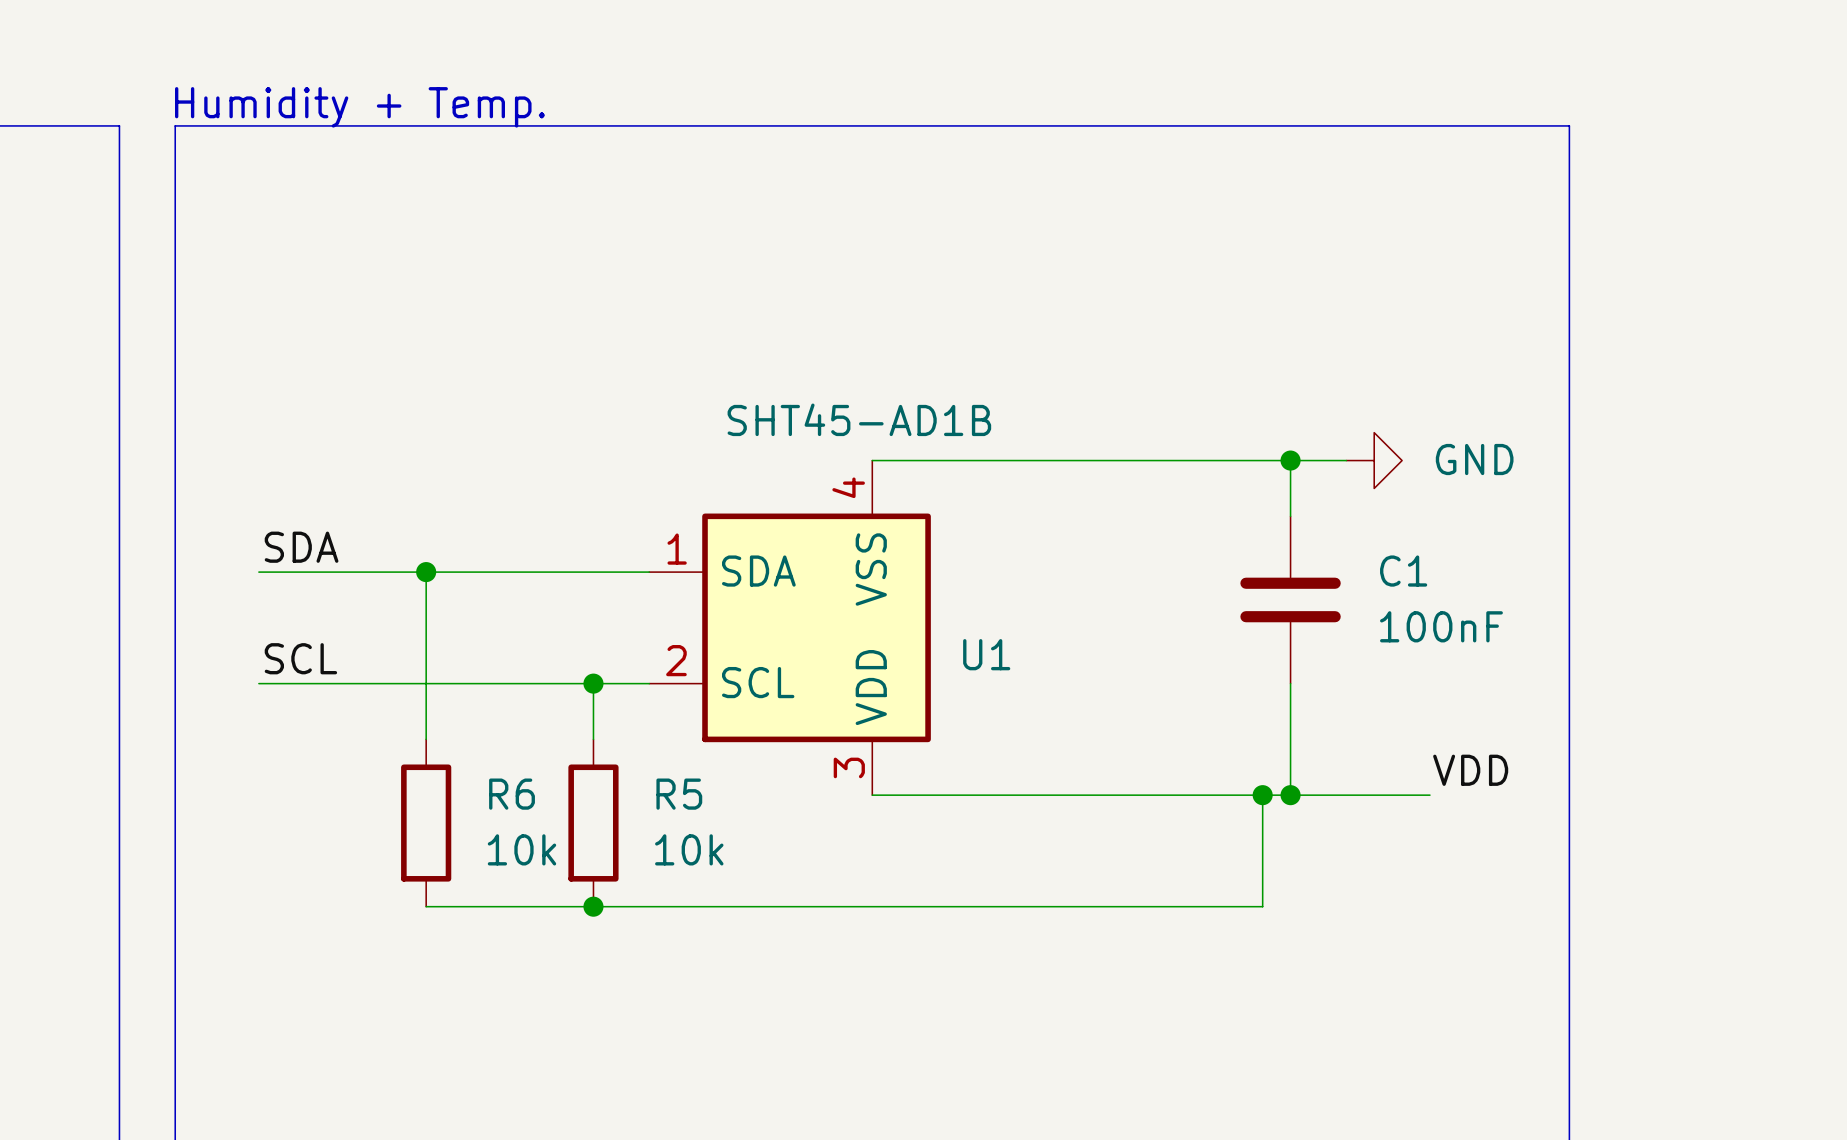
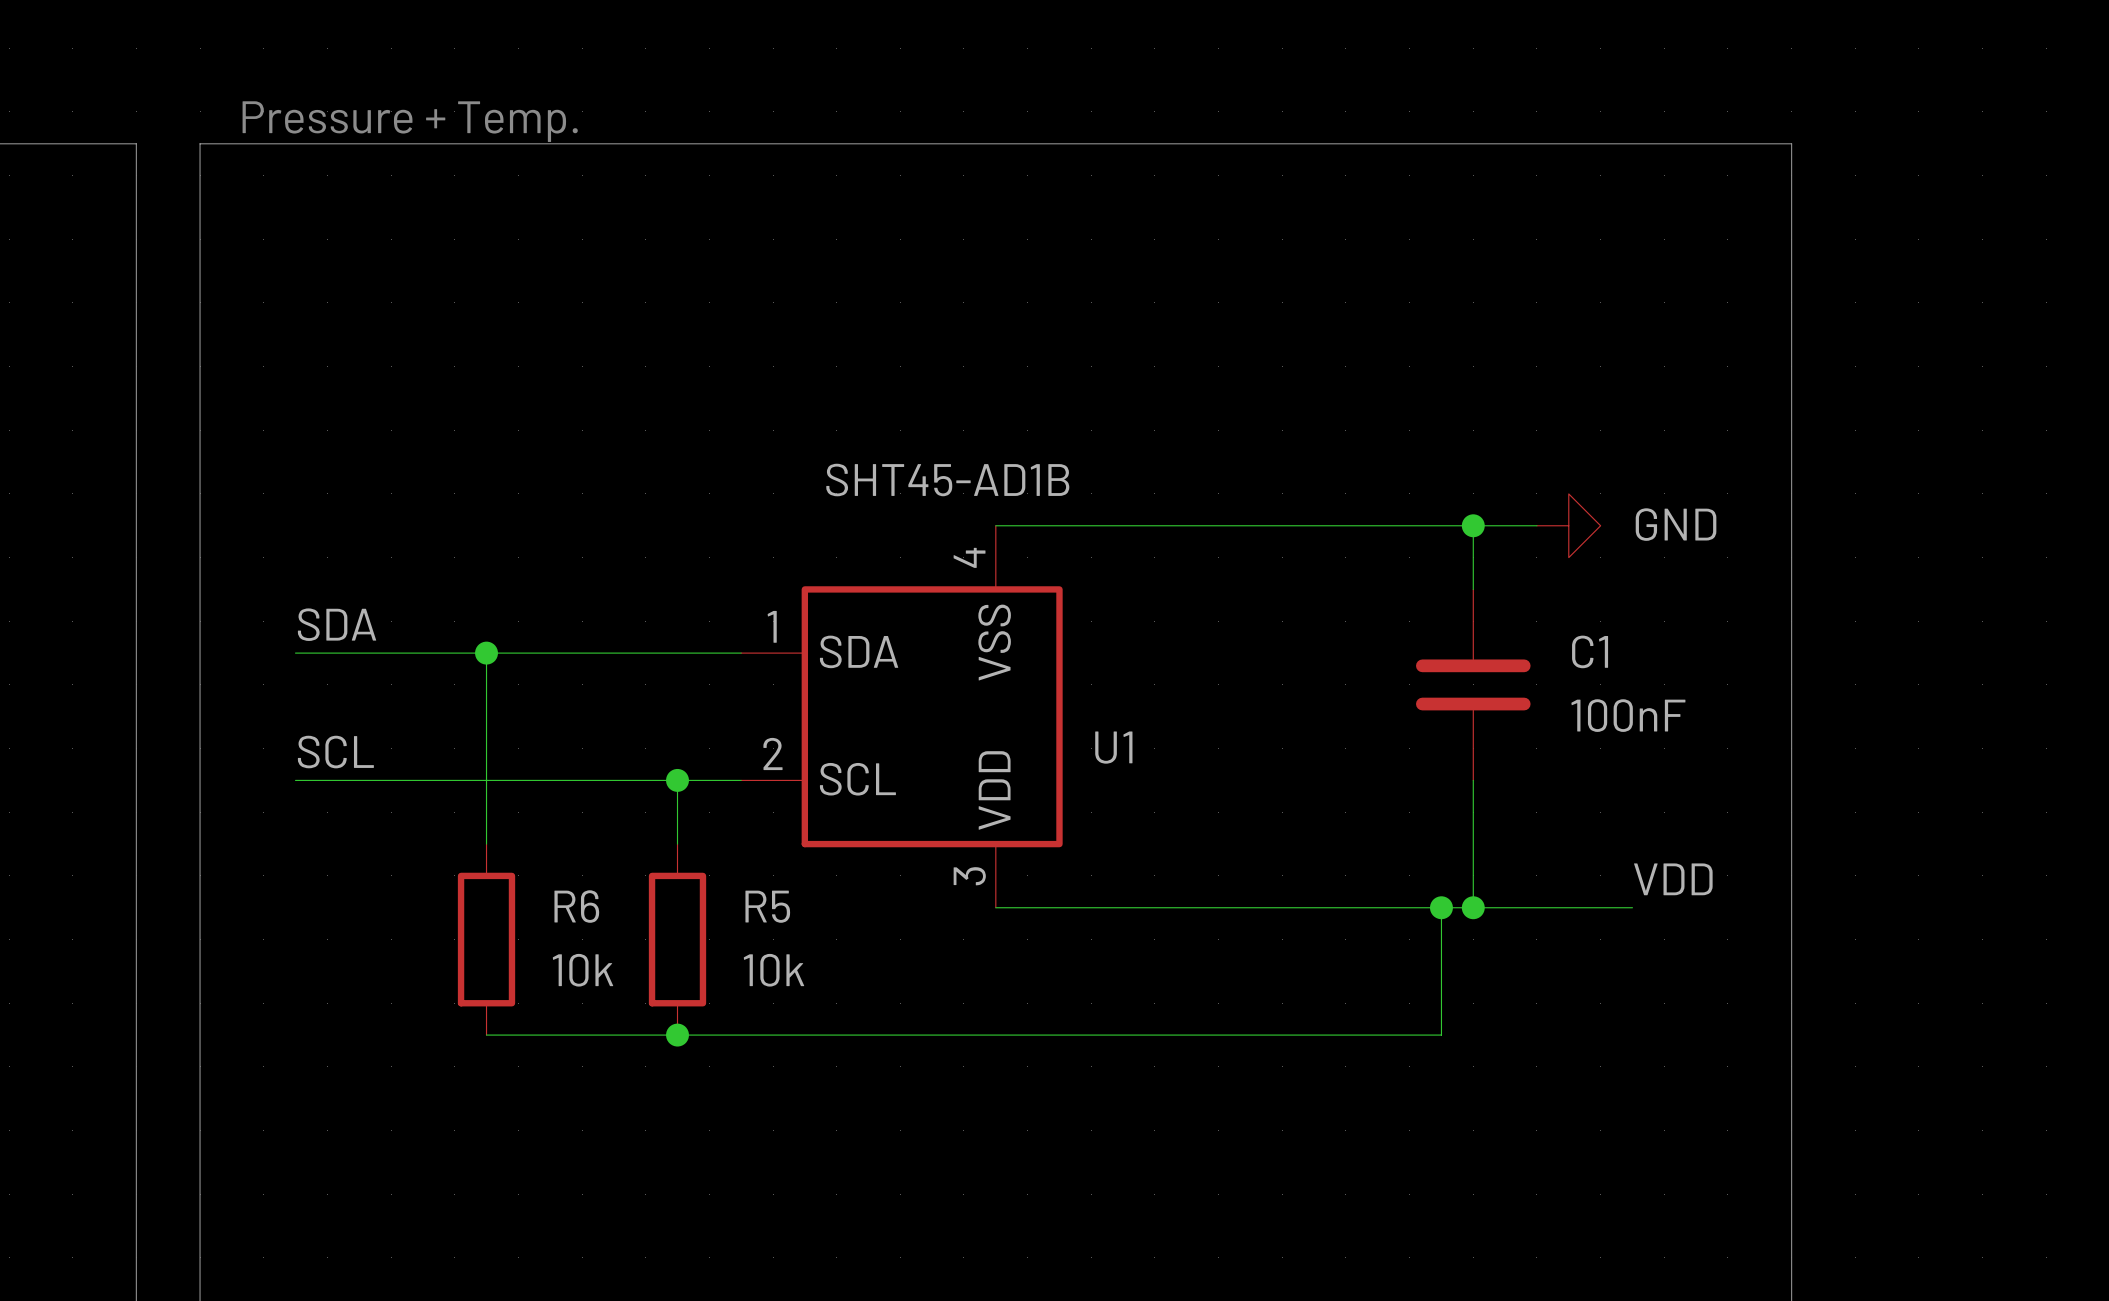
text: Humidity + Temp. (359, 107) -> Pressure + Temp. (410, 121)

